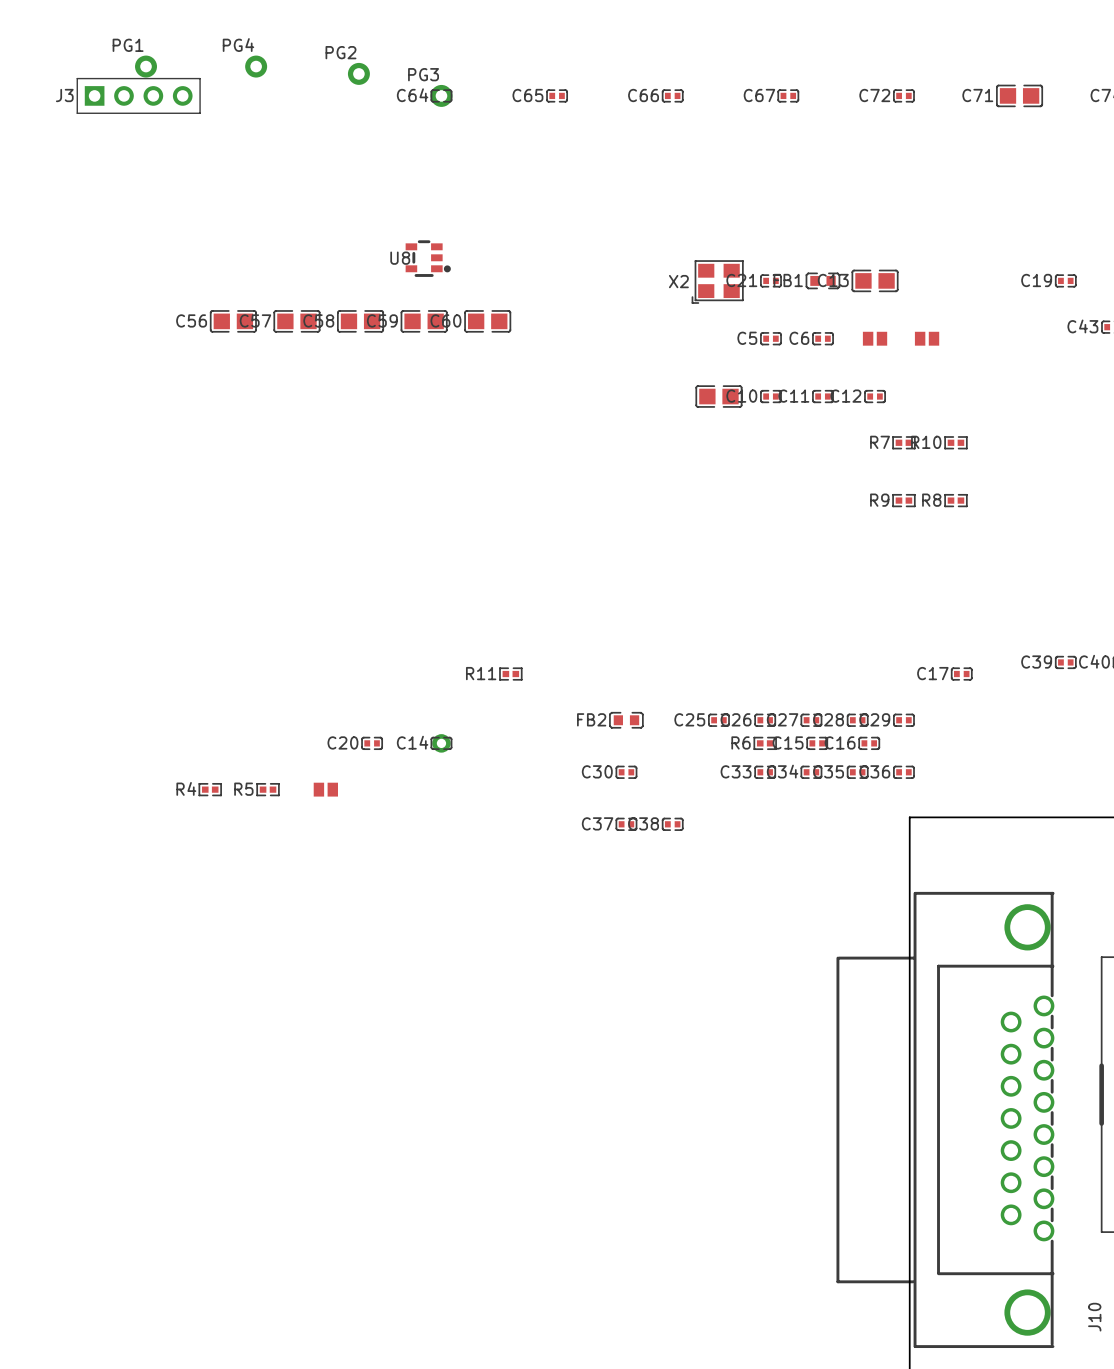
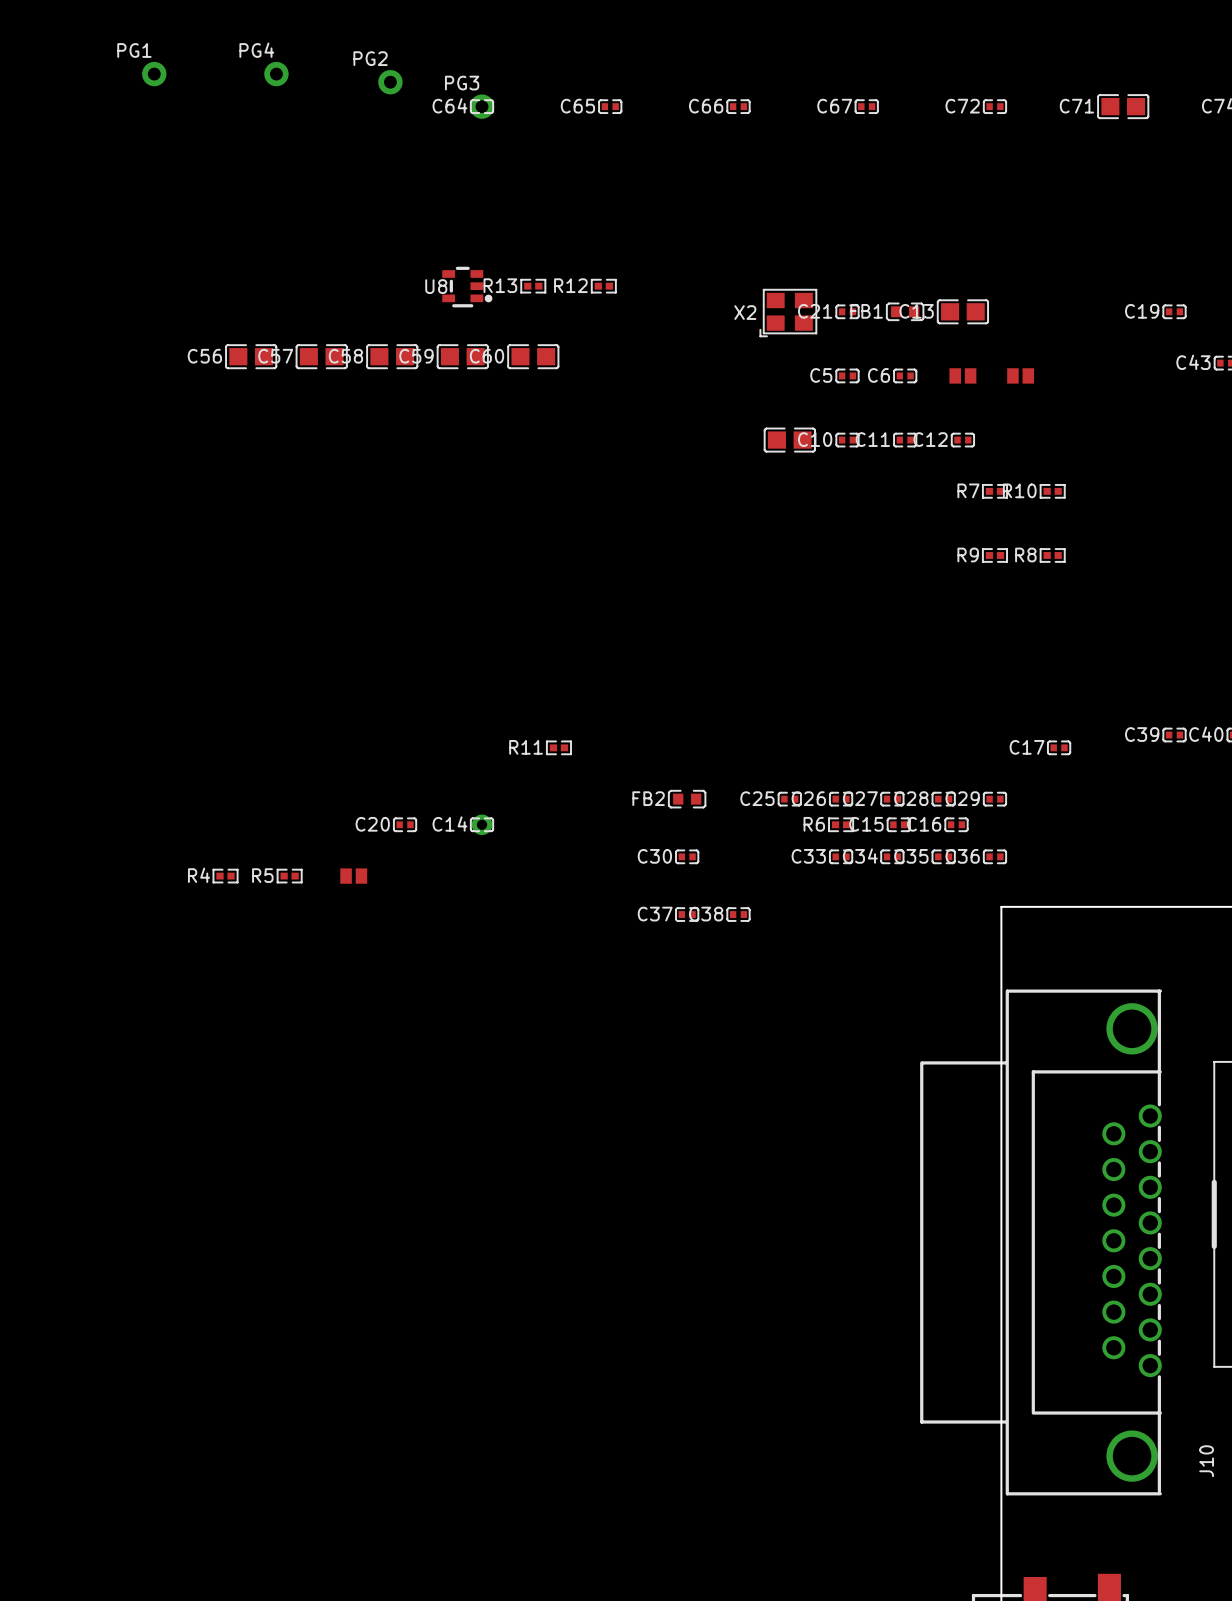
J3: (138, 95) -> none
R13: none -> (533, 286)
R12: none -> (603, 286)

